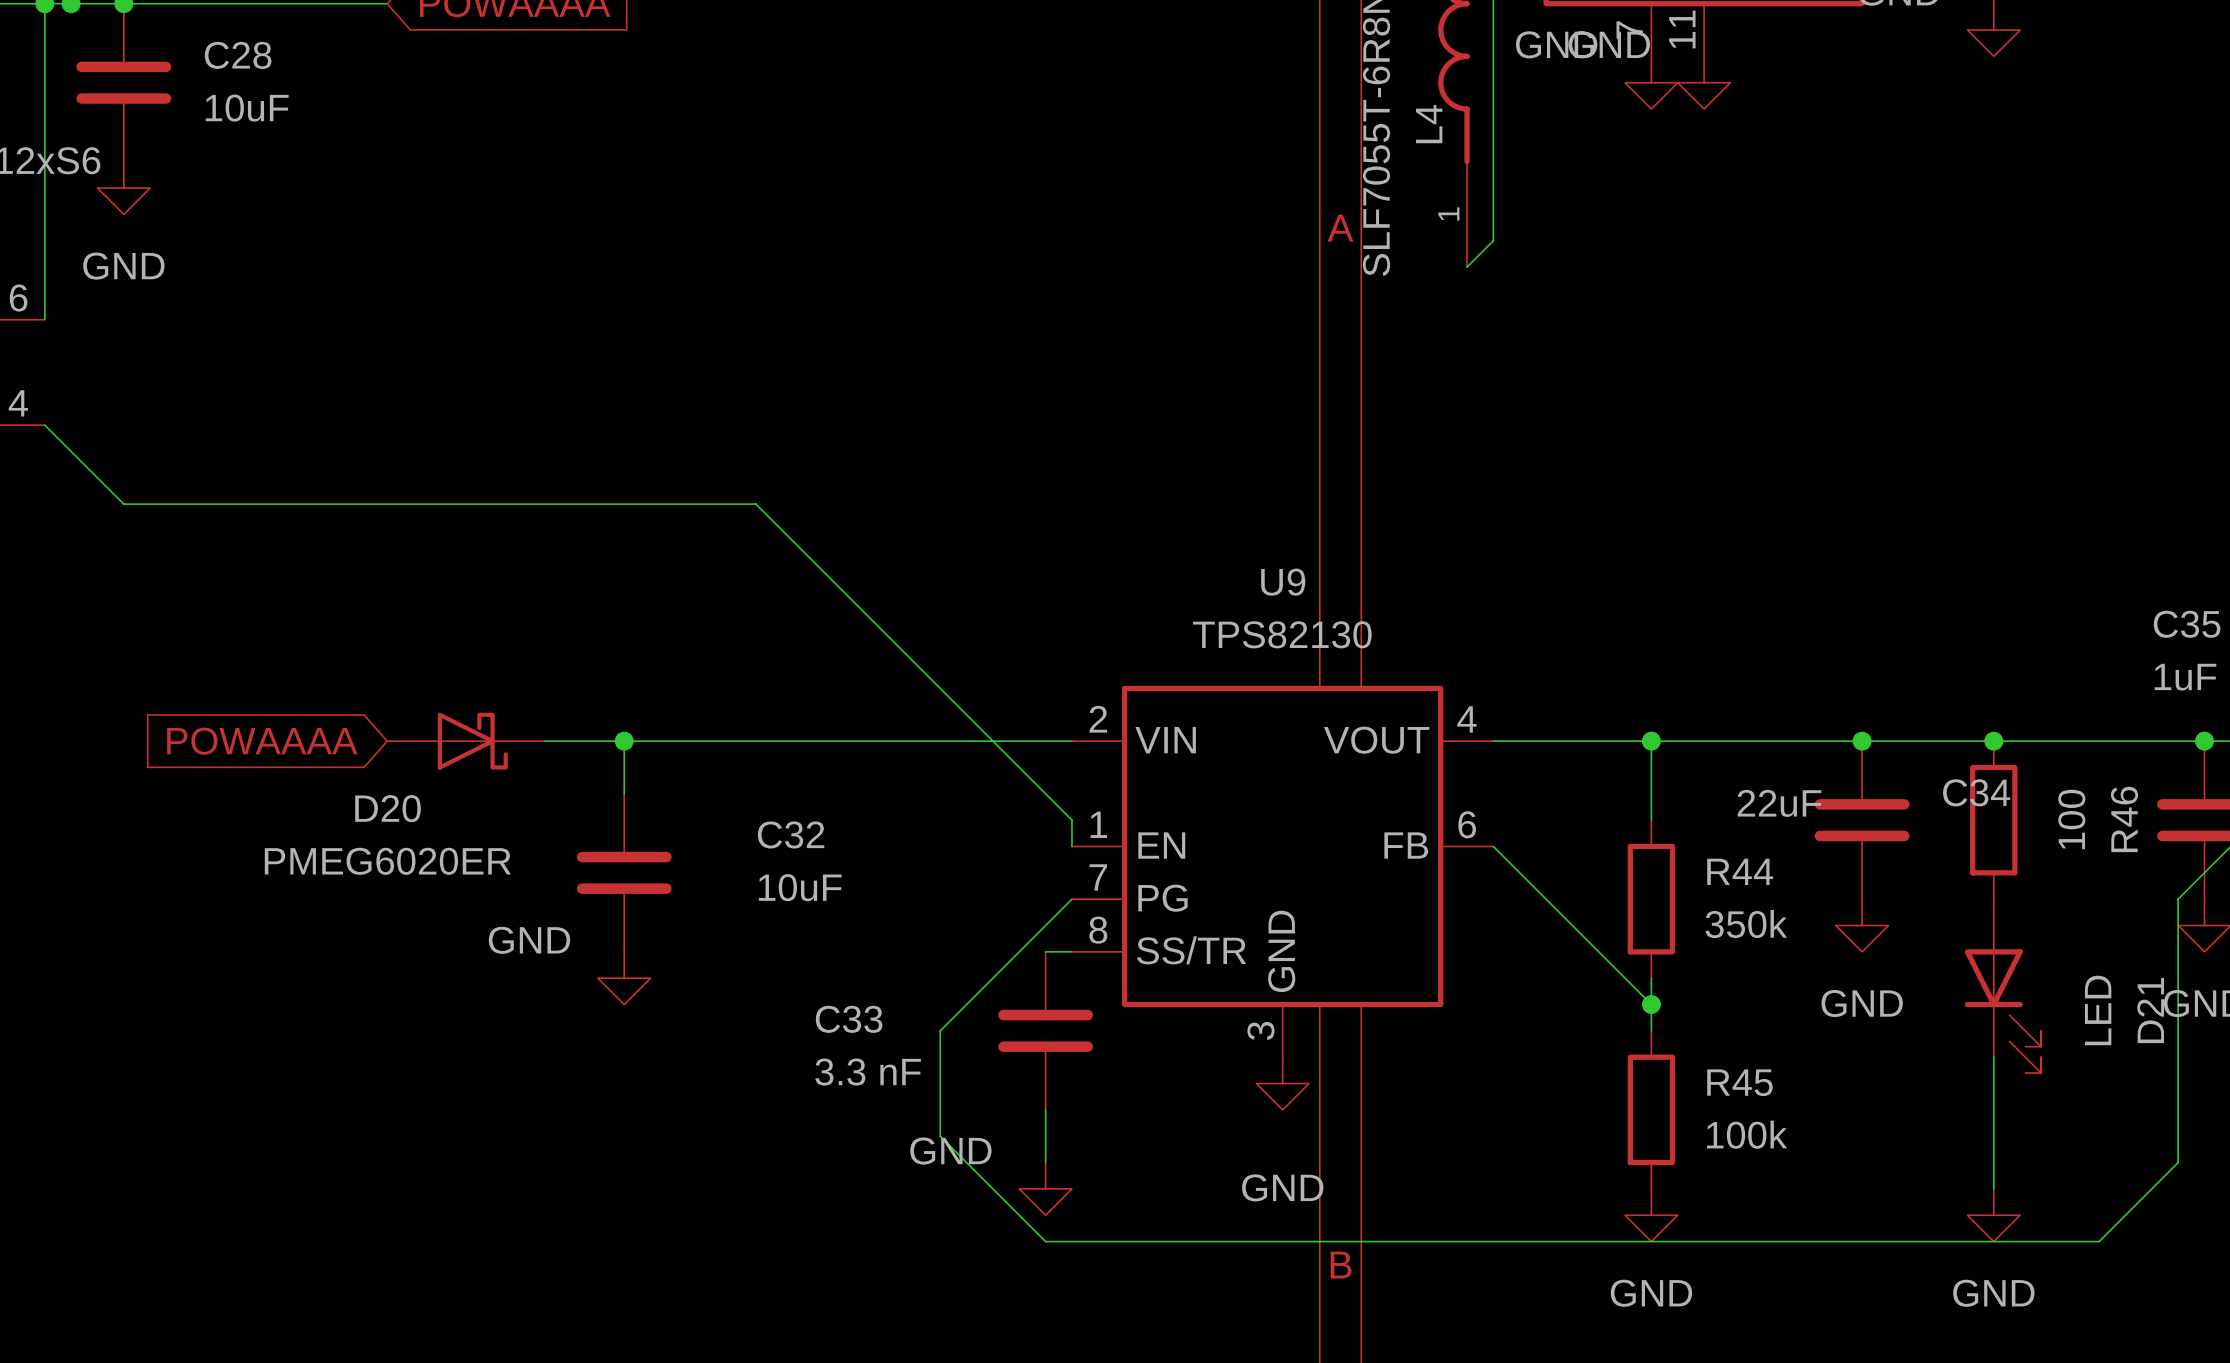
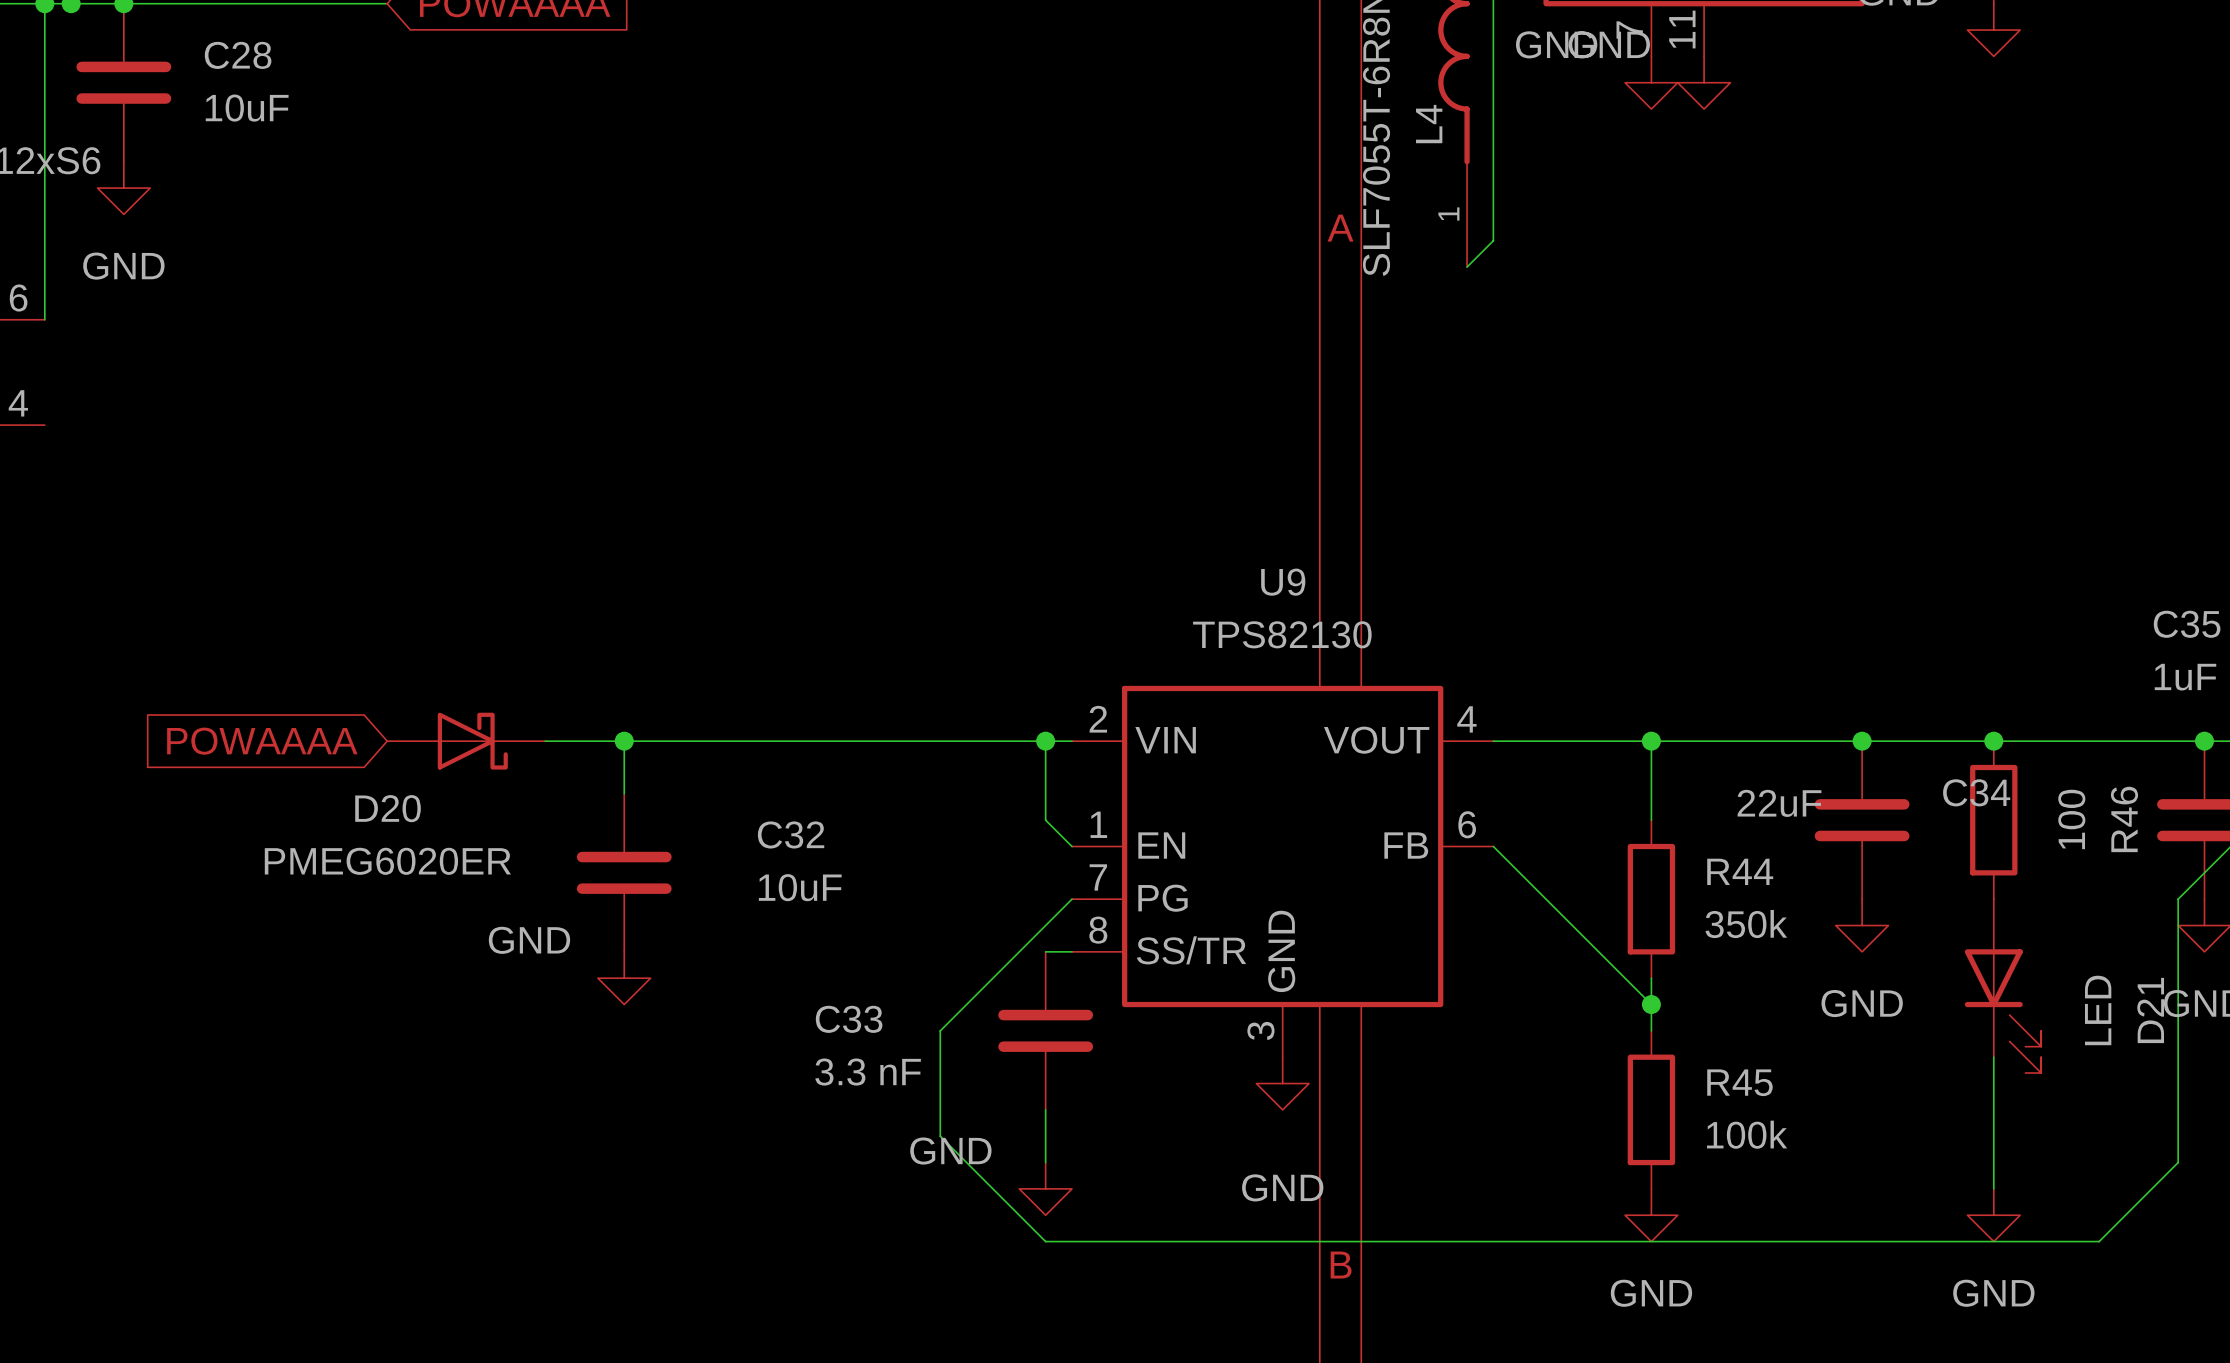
wire: (44, 425) (123, 504) (755, 504) (1071, 820) (1071, 846) -> (1045, 741) (1045, 820) (1071, 846)
junction: none -> (1045, 741)

